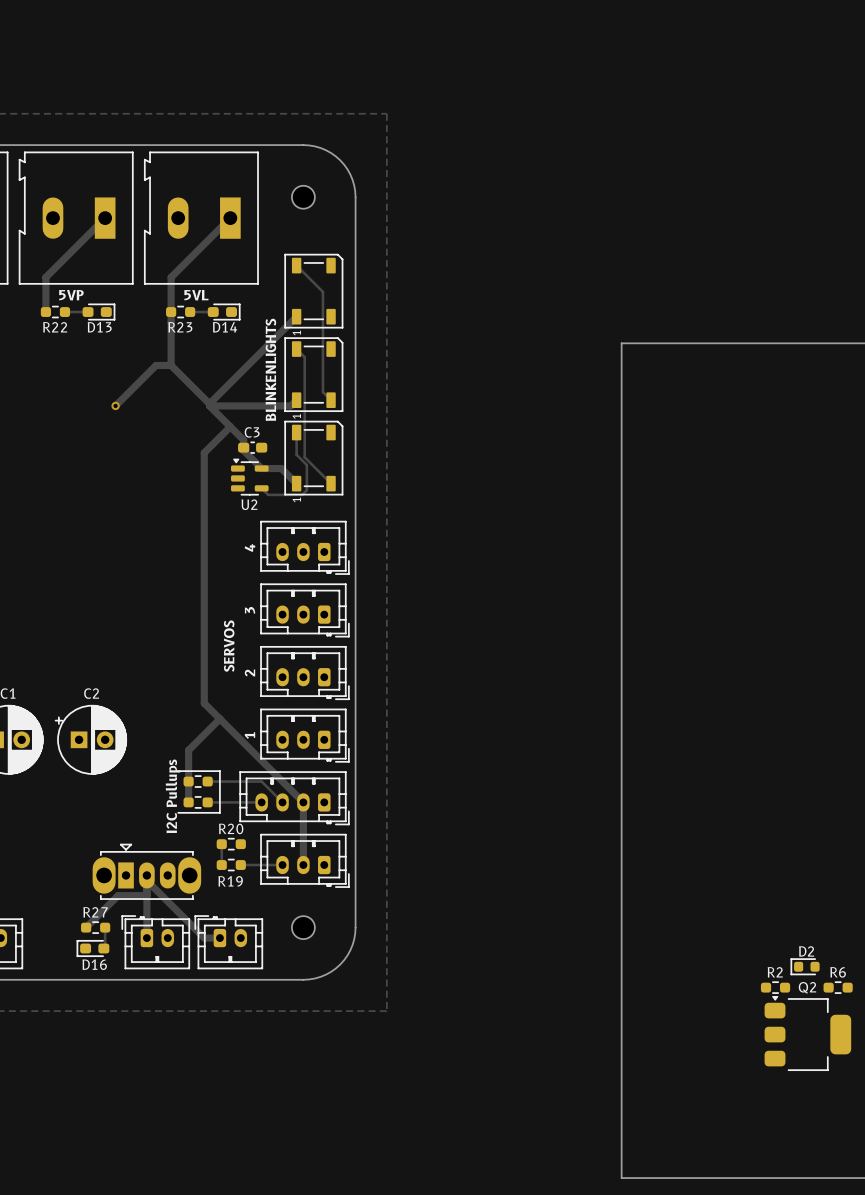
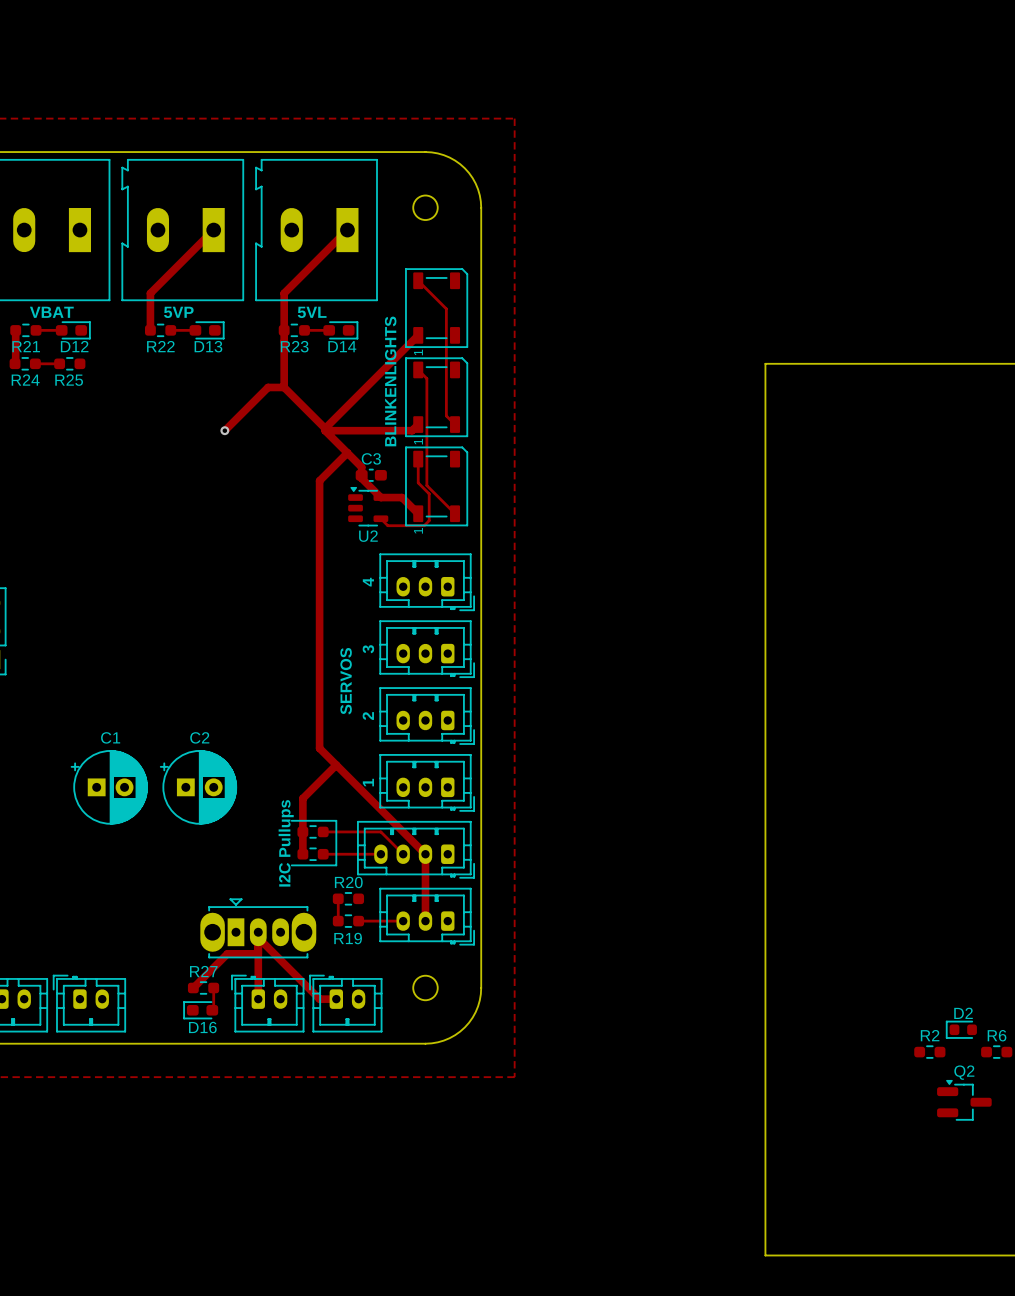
Q2 footprint: [764, 995, 852, 1071] -> [937, 1079, 992, 1121]

